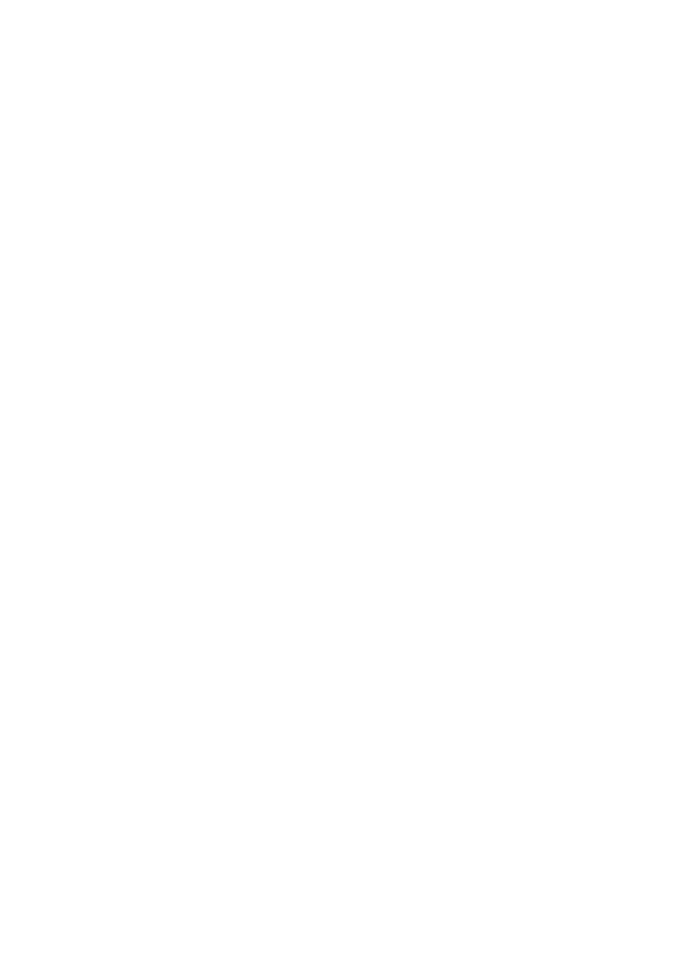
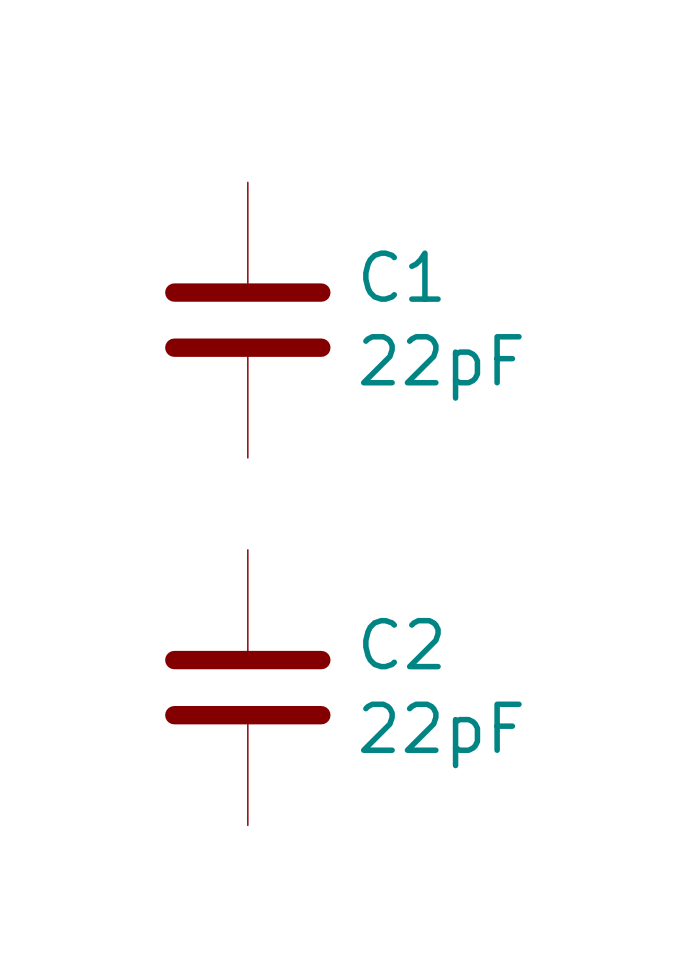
C1: none -> 22pF (247, 320)
C2: none -> 22pF (247, 687)

